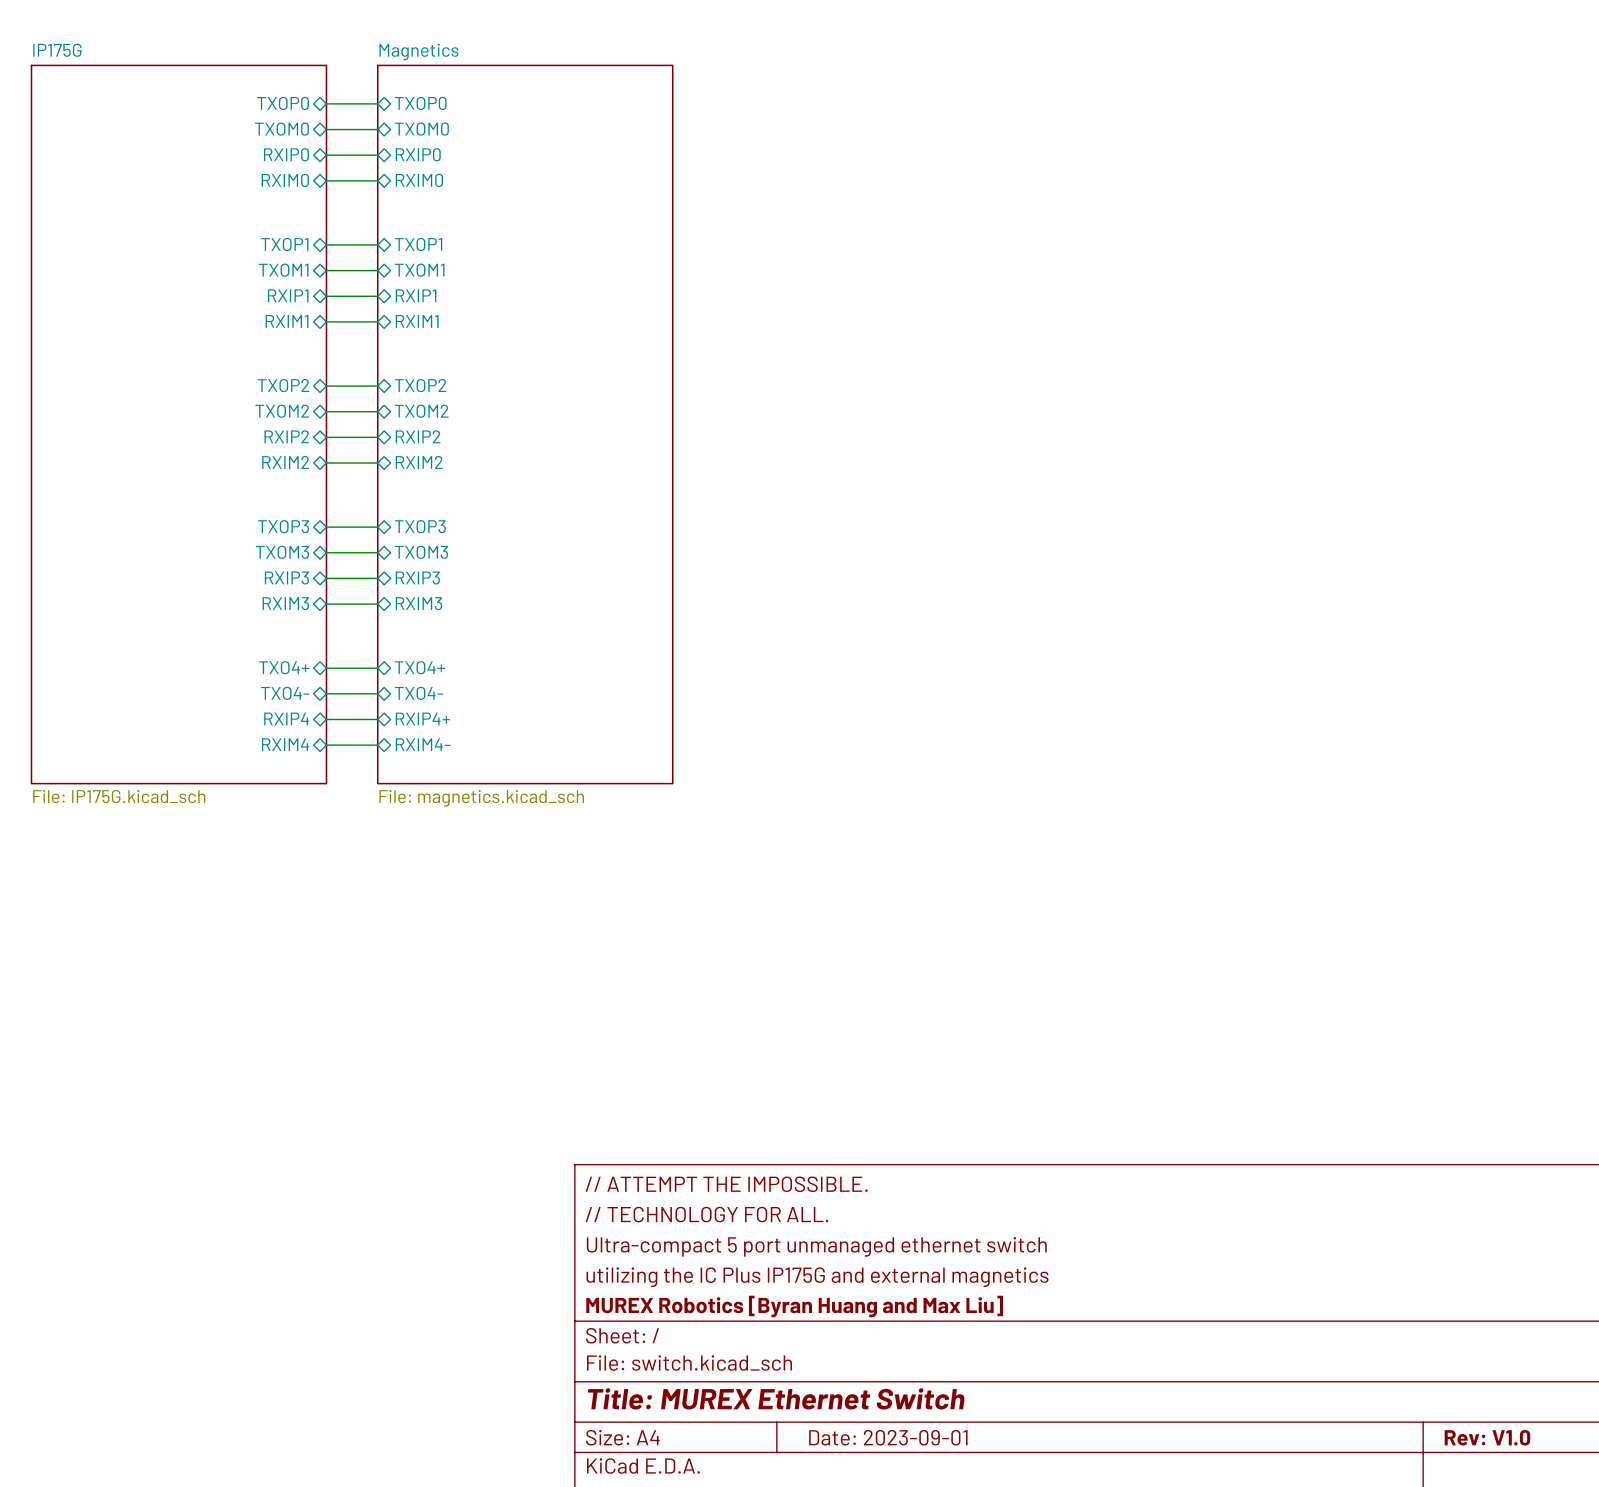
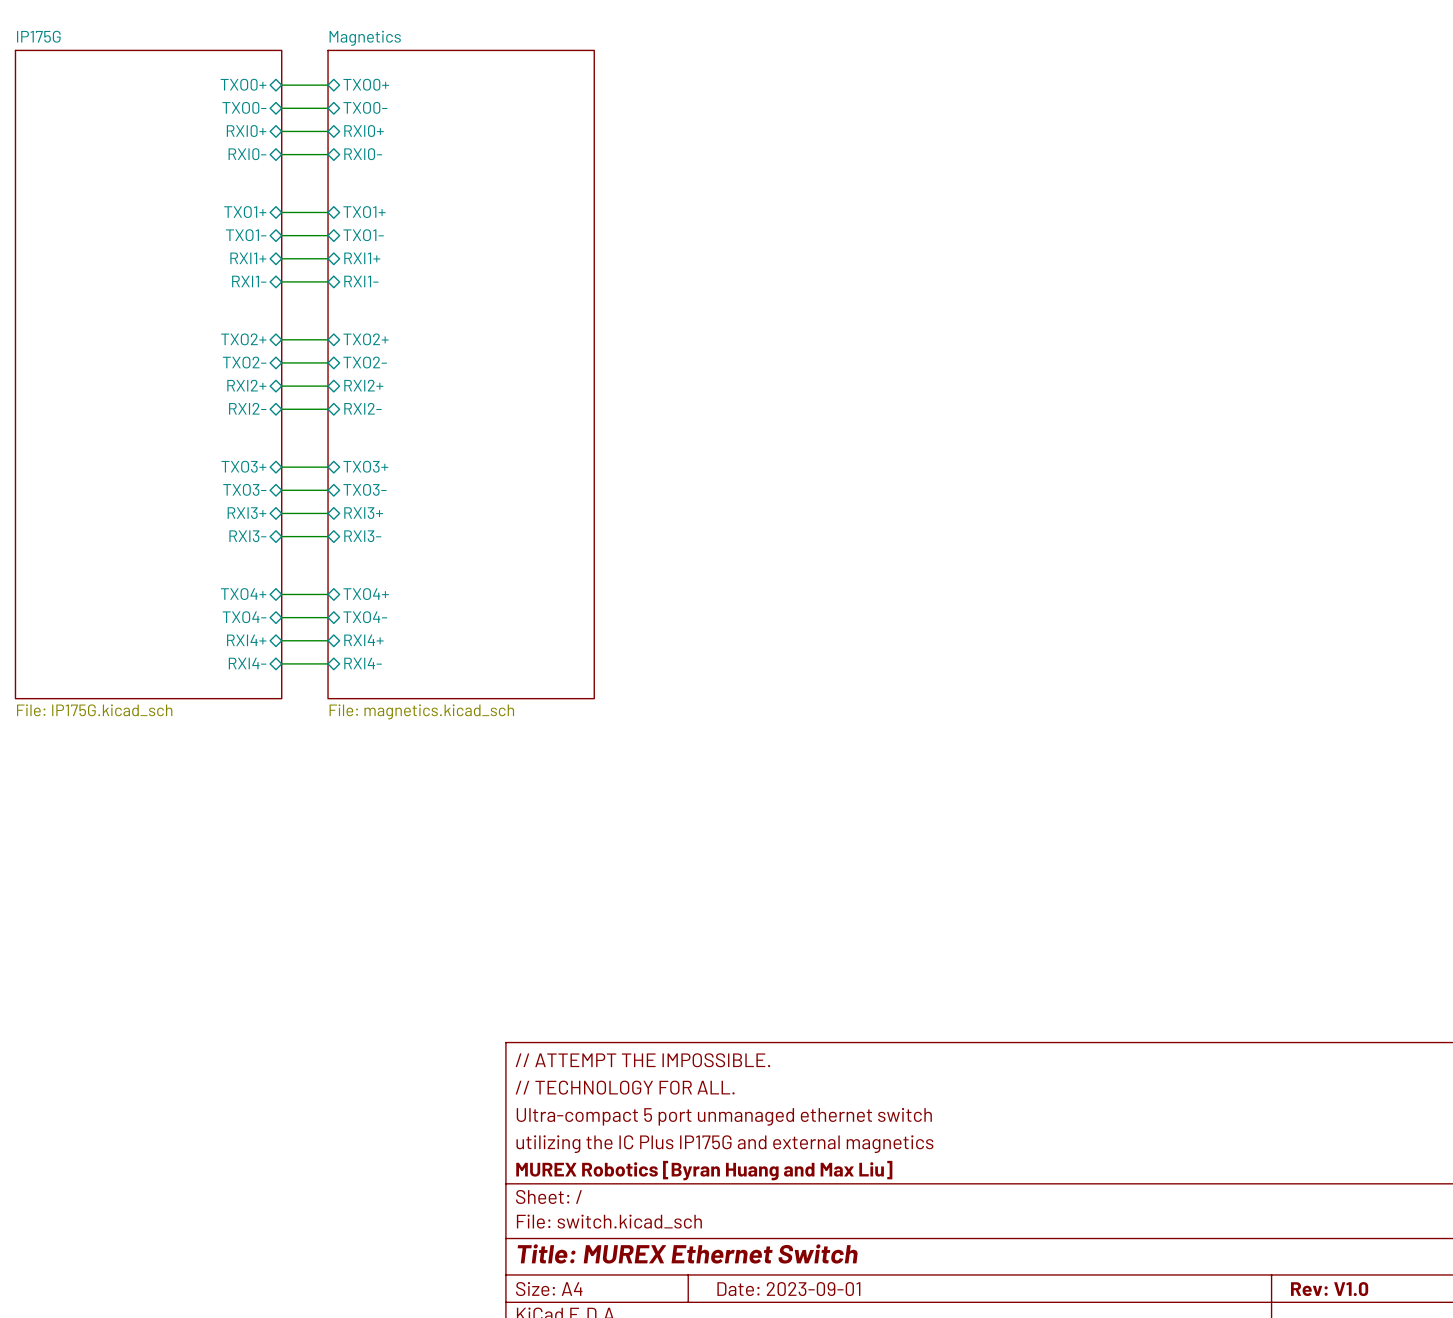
sheet pin: TXOP0 (283, 103) -> TXO0+ (243, 84)
sheet pin: TXOP0 (420, 103) -> TXO0+ (366, 84)
sheet pin: TXOM0 (281, 129) -> TXO0- (244, 107)
sheet pin: TXOM0 (421, 129) -> TXO0- (365, 107)
sheet pin: RXIP0 (286, 154) -> RXI0+ (246, 131)
sheet pin: RXIP0 (418, 154) -> RXI0+ (364, 131)
sheet pin: RXIM0 (285, 180) -> RXI0- (247, 154)
sheet pin: RXIM0 (419, 180) -> RXI0- (363, 154)
sheet pin: TXOP1 (284, 244) -> TXO1+ (245, 212)
sheet pin: TXOP1 (418, 244) -> TXO1+ (364, 212)
sheet pin: TXOM1 (283, 270) -> TXO1- (246, 235)
sheet pin: TXOM1 (419, 270) -> TXO1- (363, 235)
sheet pin: RXIP1 (288, 295) -> RXI1+ (248, 258)
sheet pin: RXIP1 (416, 295) -> RXI1+ (362, 258)
sheet pin: RXIM1 (287, 321) -> RXI1- (249, 281)
sheet pin: RXIM1 (417, 321) -> RXI1- (361, 281)
sheet pin: TXOP2 (283, 385) -> TXO2+ (243, 339)
sheet pin: TXOP2 (420, 385) -> TXO2+ (366, 339)
sheet pin: TXOM2 (282, 411) -> TXO2- (244, 362)
sheet pin: TXOM2 (421, 411) -> TXO2- (365, 362)
sheet pin: RXIP2 (286, 436) -> RXI2+ (246, 385)
sheet pin: RXIP2 (418, 436) -> RXI2+ (363, 385)
sheet pin: RXIM2 (285, 462) -> RXI2- (247, 408)
sheet pin: RXIM2 (419, 462) -> RXI2- (362, 408)
sheet pin: TXOP3 (283, 526) -> TXO3+ (243, 466)
sheet pin: TXOP3 (420, 526) -> TXO3+ (365, 466)
sheet pin: TXOM3 (282, 552) -> TXO3- (244, 489)
sheet pin: TXOM3 (421, 552) -> TXO3- (364, 489)
sheet pin: RXIP3 (286, 578) -> RXI3+ (247, 513)
sheet pin: RXIP3 (417, 578) -> RXI3+ (363, 513)
sheet pin: RXIM3 (285, 603) -> RXI3- (247, 536)
sheet pin: RXIM3 (418, 603) -> RXI3- (362, 536)
sheet pin: RXIP4 (286, 719) -> RXI4+ (246, 640)
sheet pin: RXIP4+ (422, 719) -> RXI4+ (363, 640)
sheet pin: RXIM4 (285, 744) -> RXI4- (247, 663)
sheet pin: RXIM4- (423, 744) -> RXI4- (363, 663)

